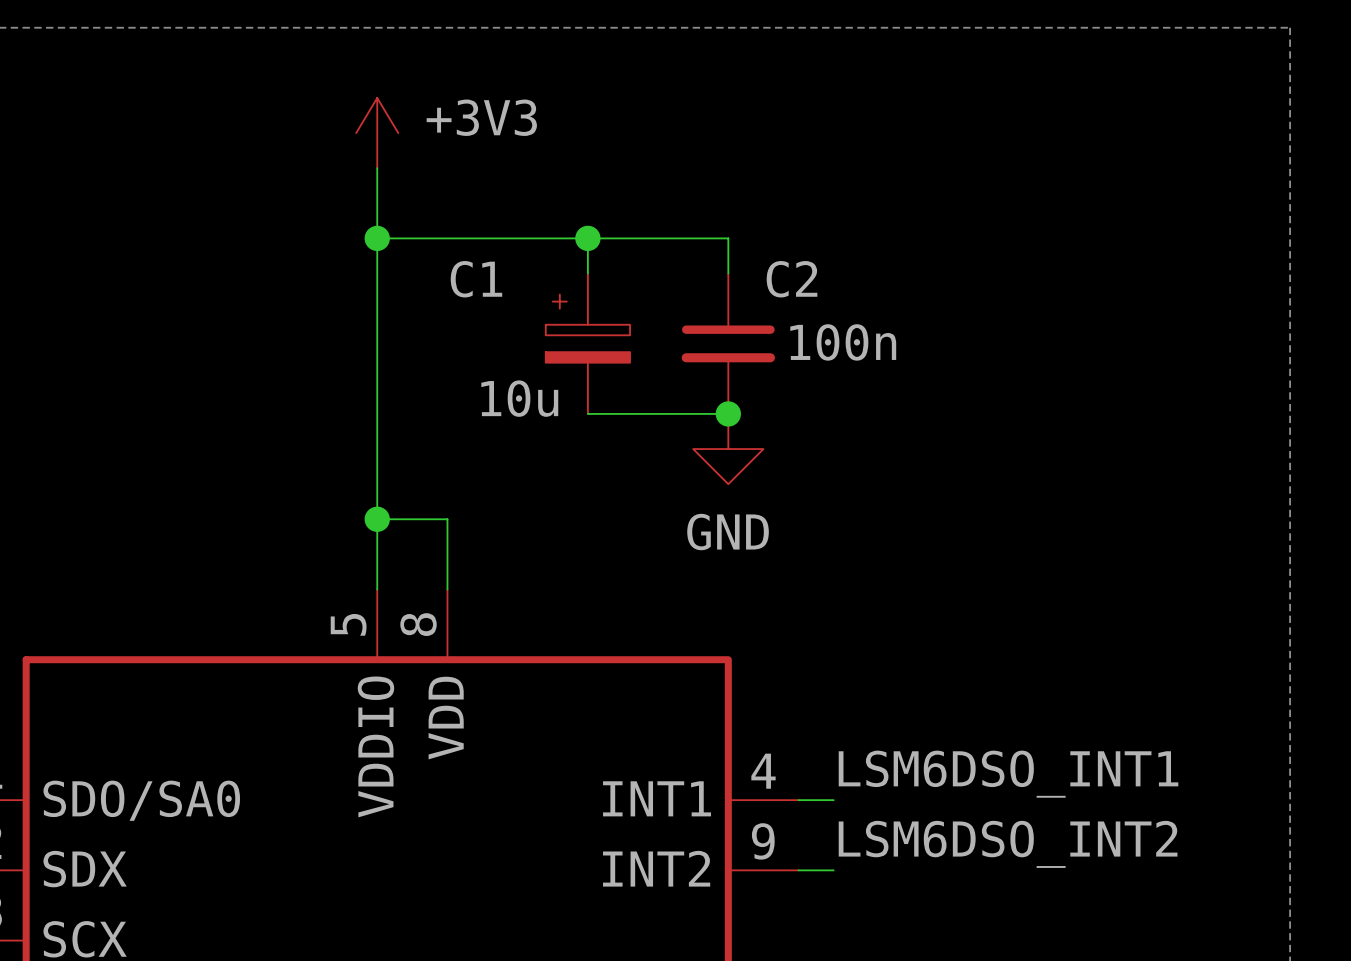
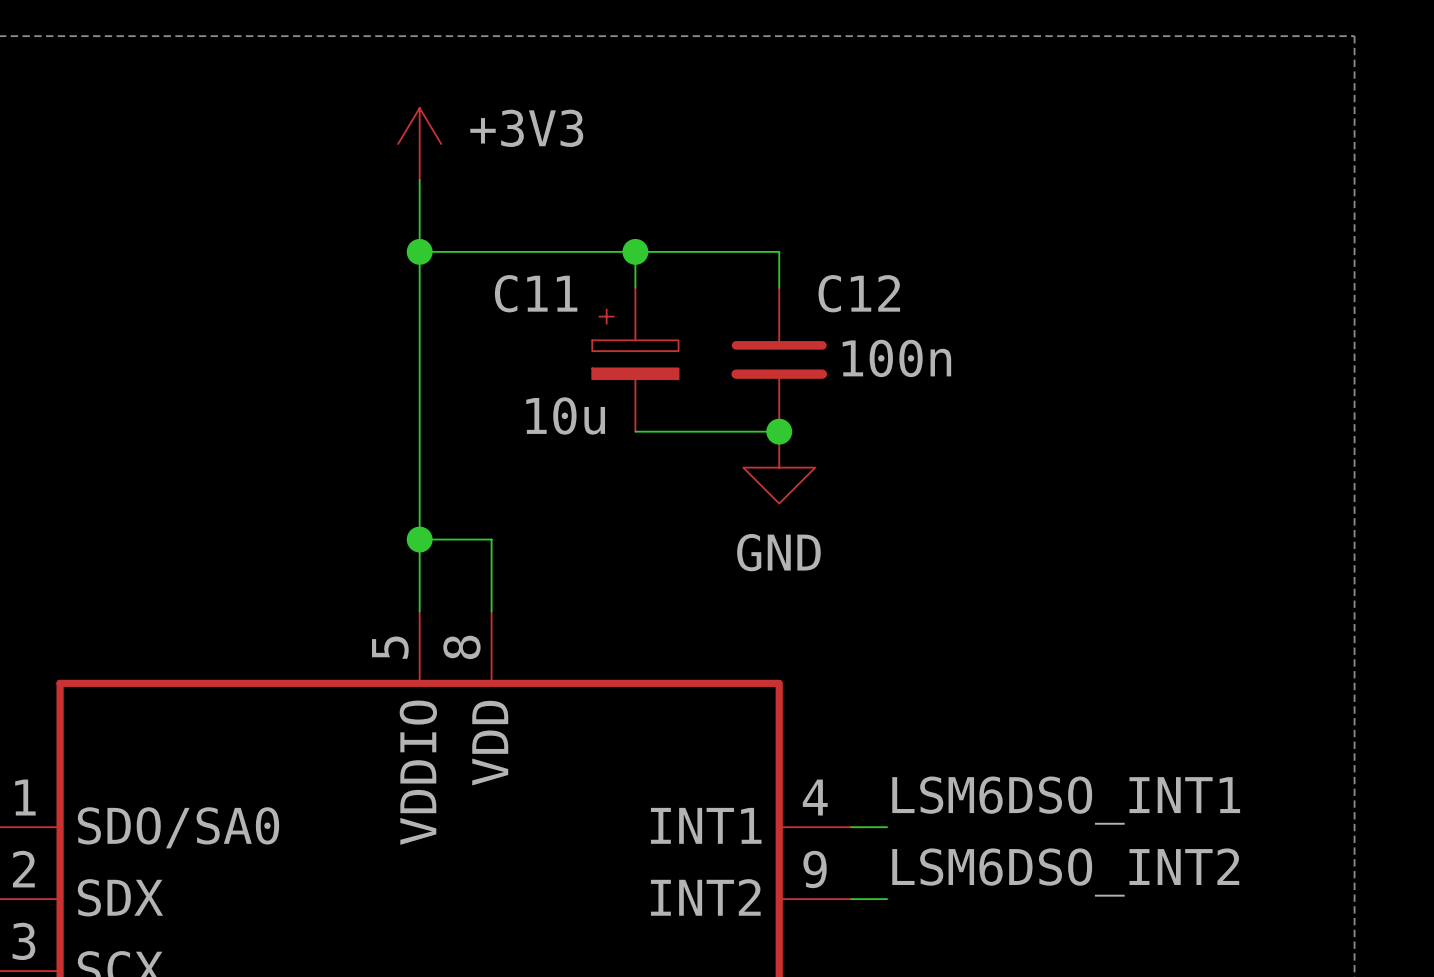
C1 name: C1 (476, 279) -> C11 (536, 293)
C2 name: C2 (792, 279) -> C12 (859, 293)

